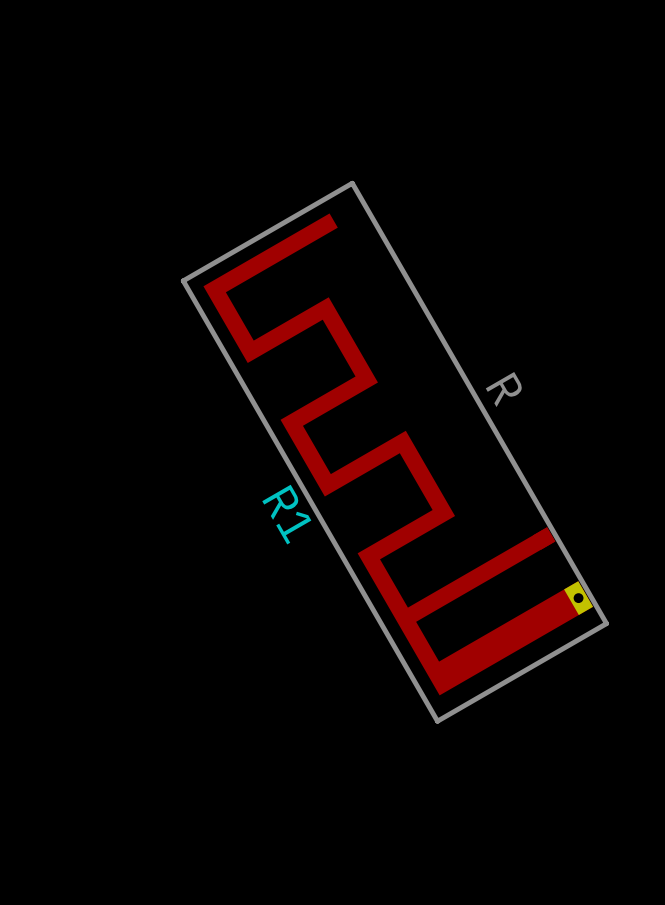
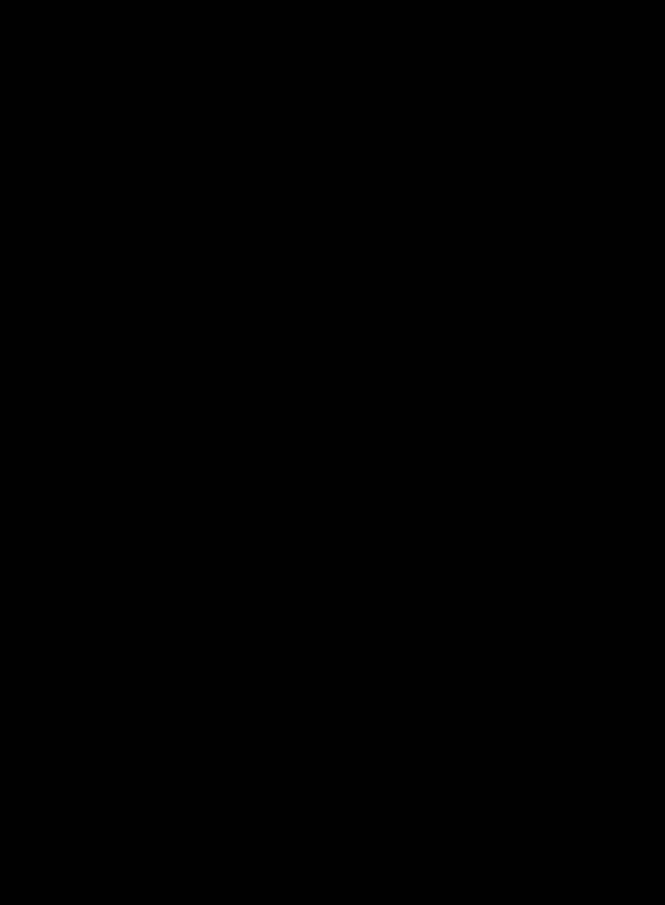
R1: R (394, 452) -> none

